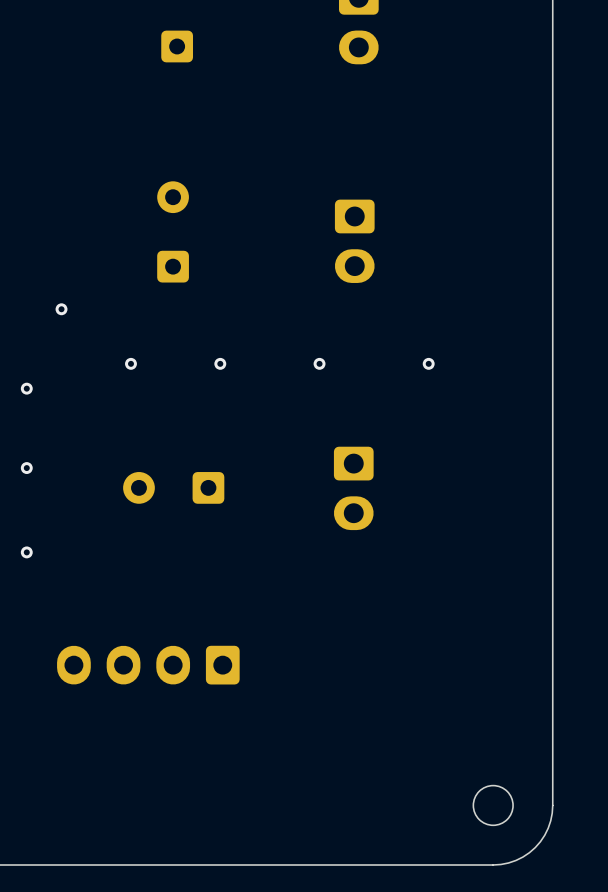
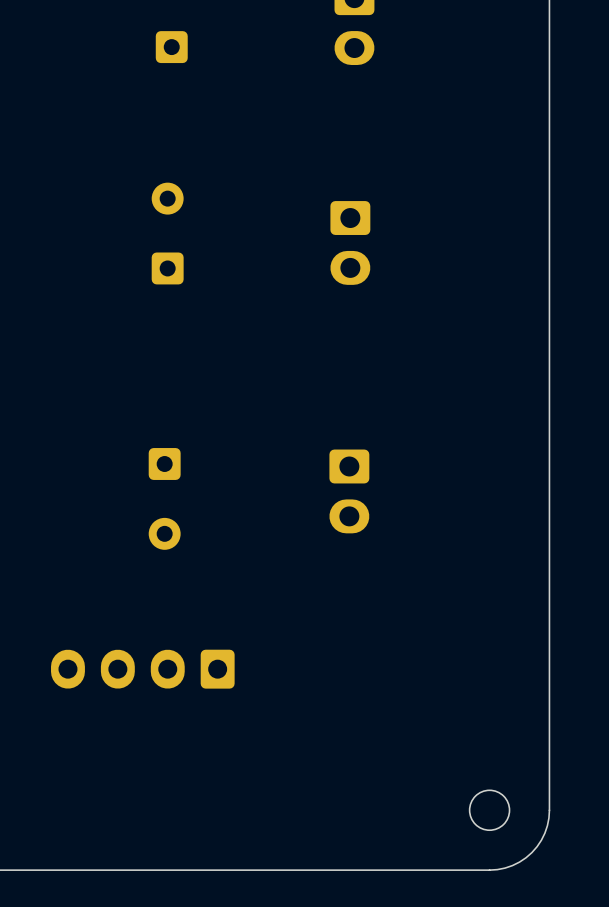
via: (61, 309) -> none
via: (130, 363) -> none
via: (220, 363) -> none
via: (319, 363) -> none
via: (428, 363) -> none
via: (26, 388) -> none
via: (26, 468) -> none
part rotation: 0° (173, 487) -> 90° counterclockwise (164, 498)
via: (26, 552) -> none

